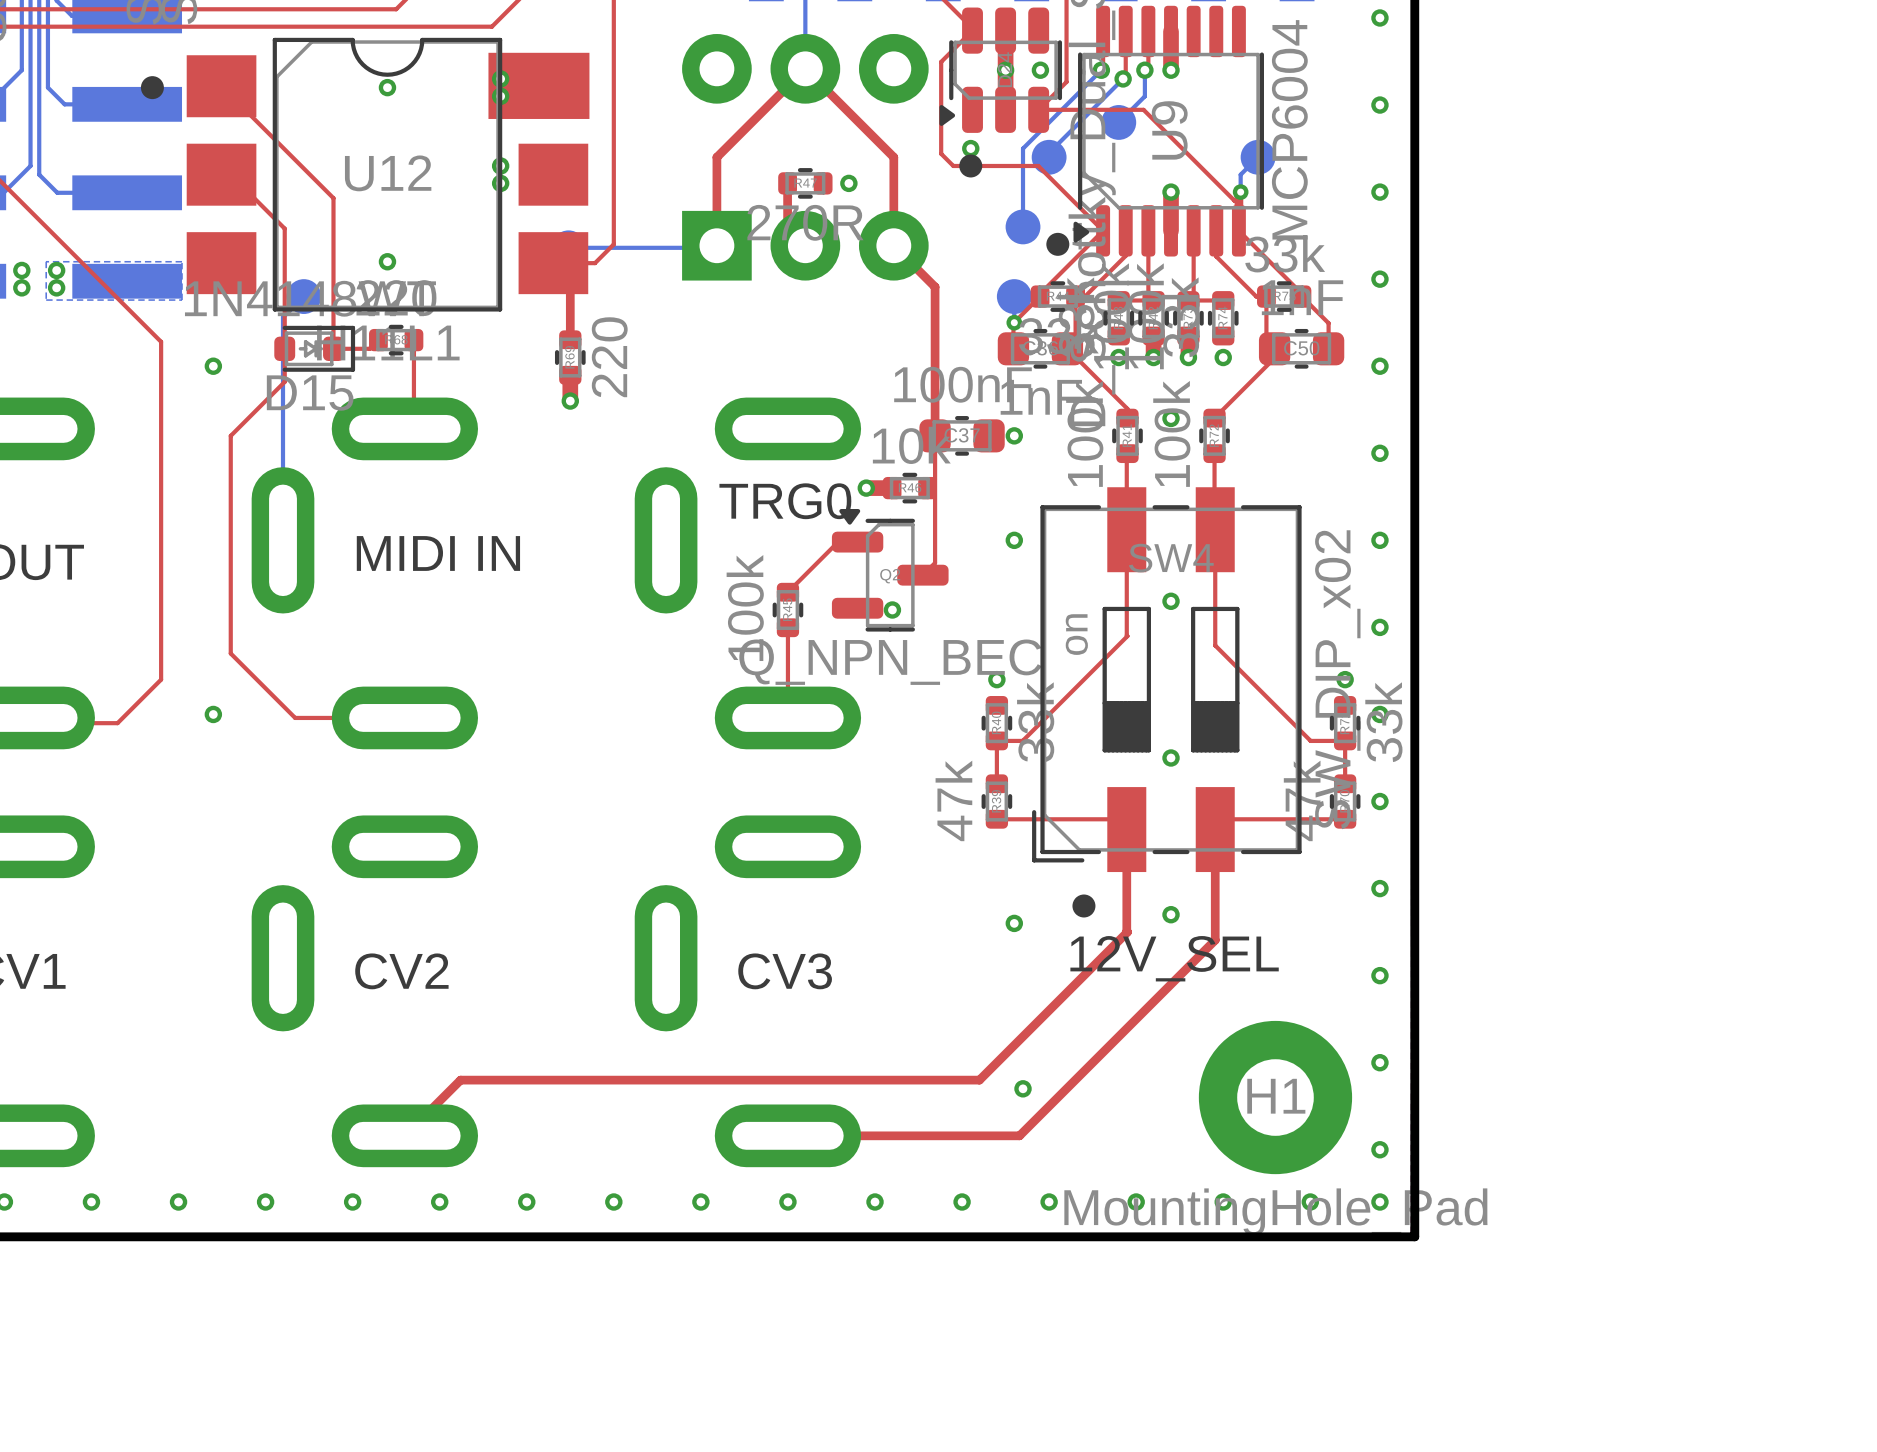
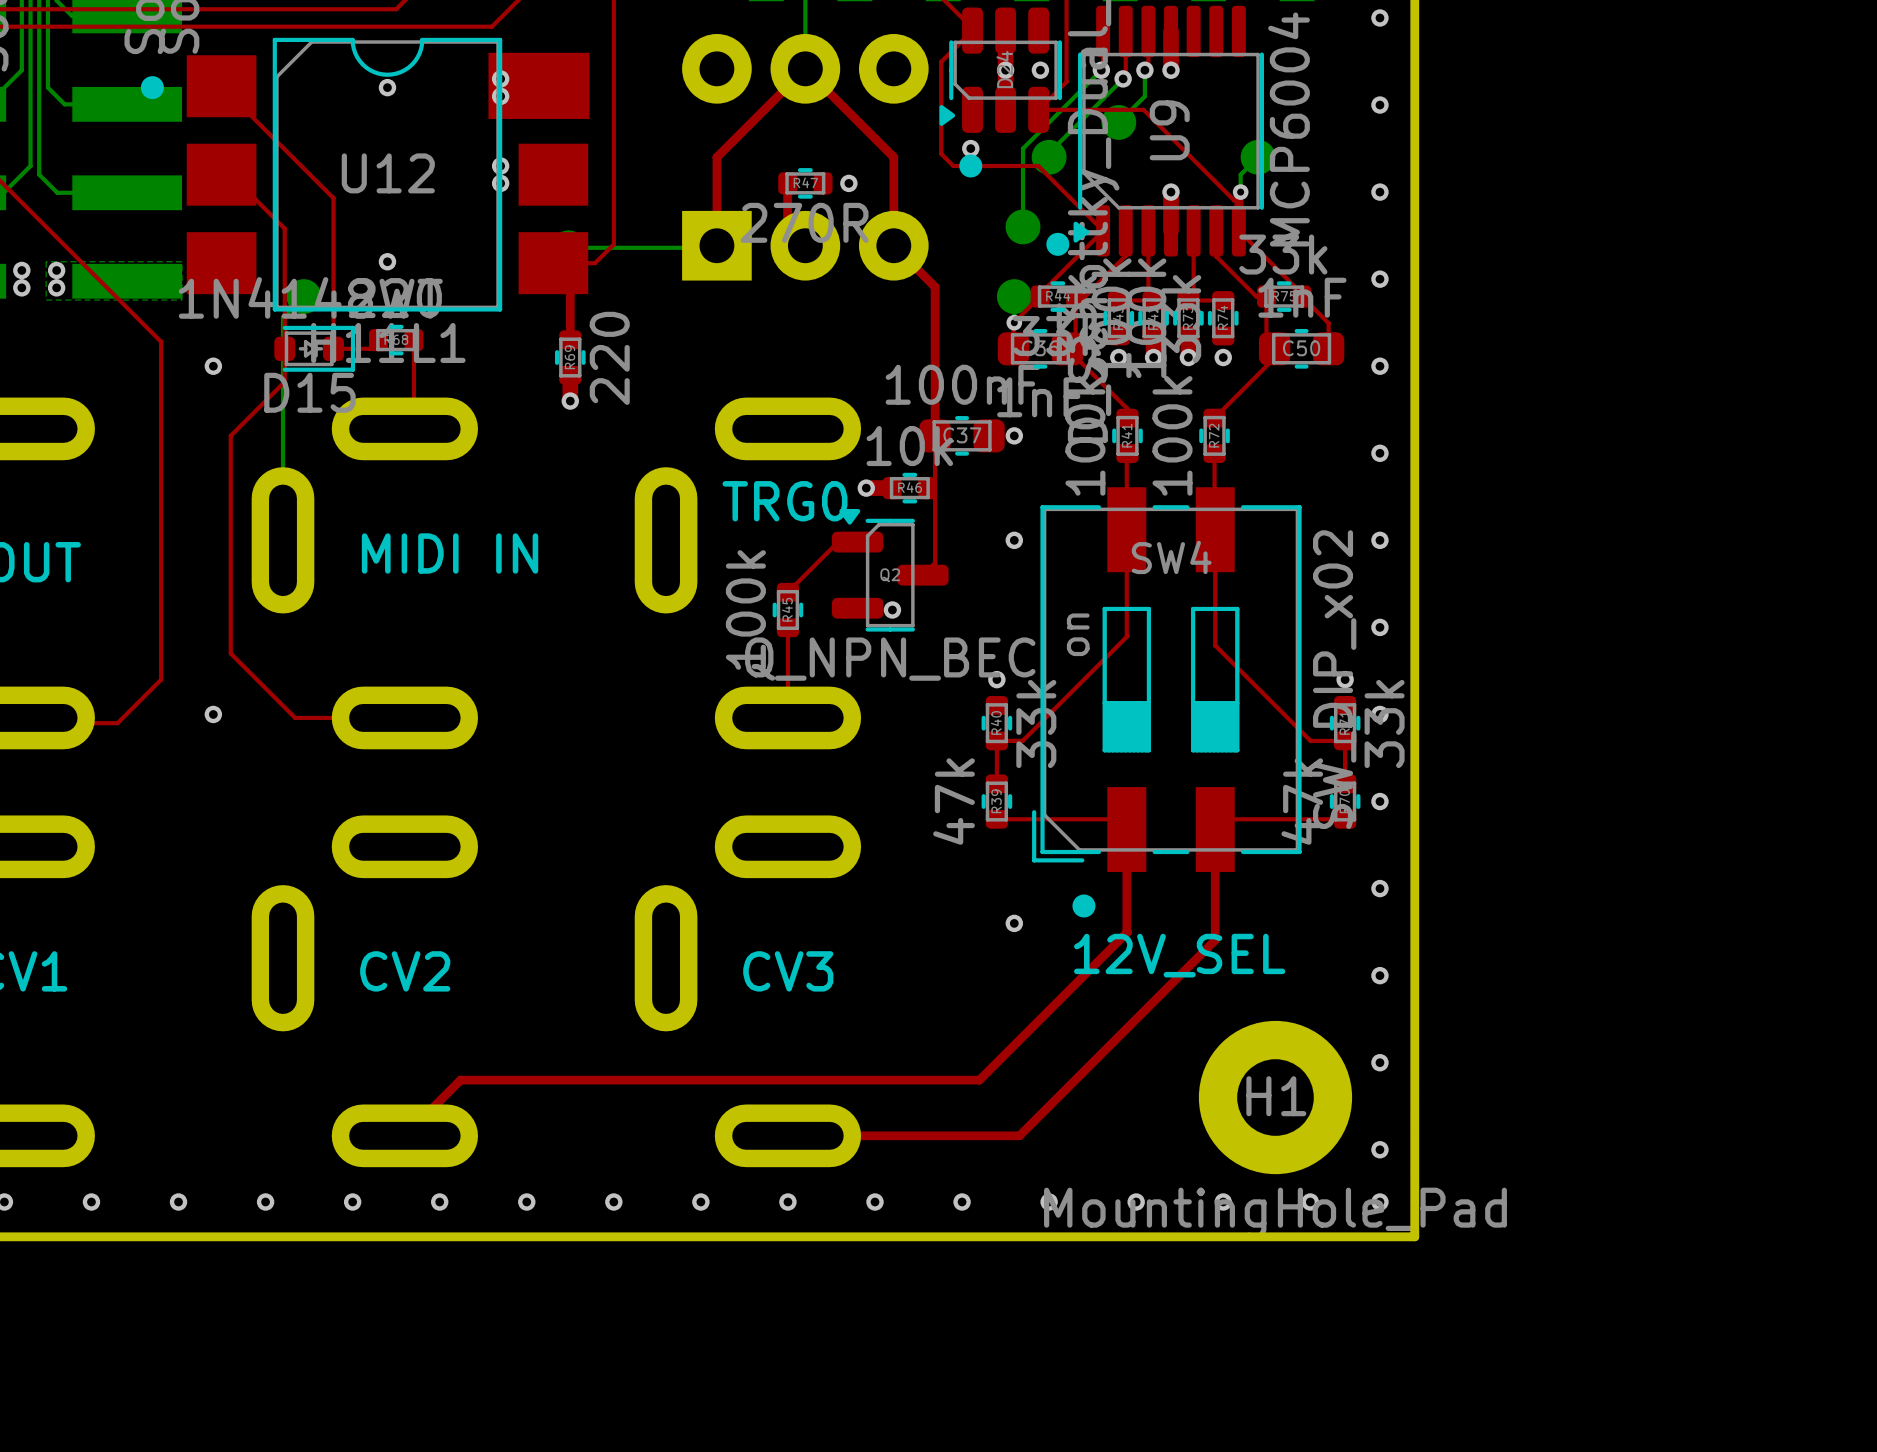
via: (1171, 418) -> none
via: (1171, 601) -> none
via: (1171, 757) -> none
via: (1171, 914) -> none
via: (1023, 1088) -> none

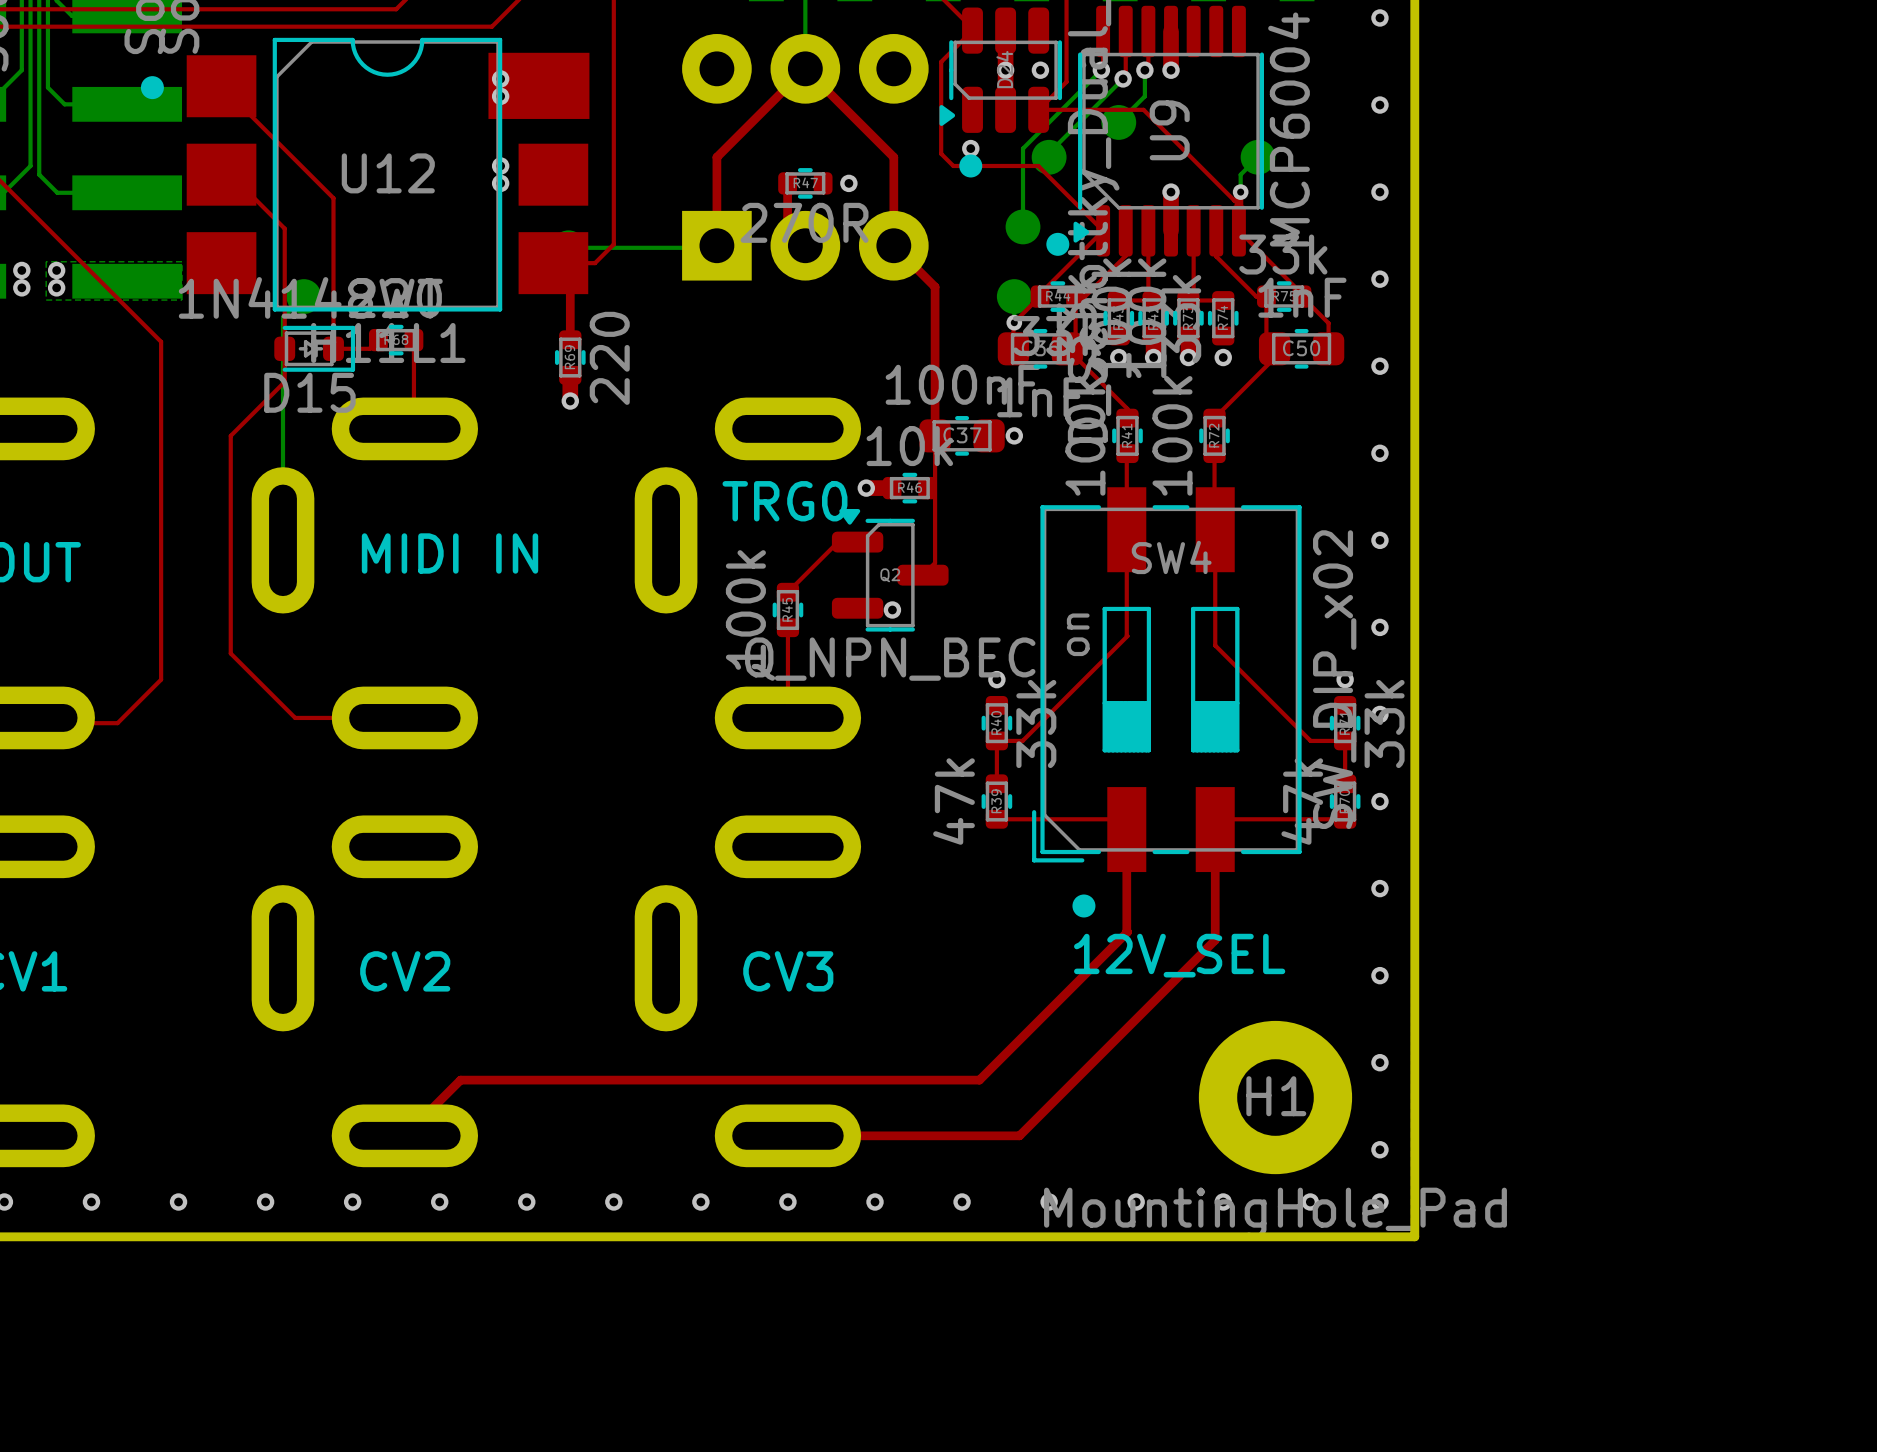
via: (387, 87) -> none
via: (387, 261) -> none
via: (213, 366) -> none
via: (1014, 540) -> none
via: (213, 714) -> none
via: (1014, 923) -> none

